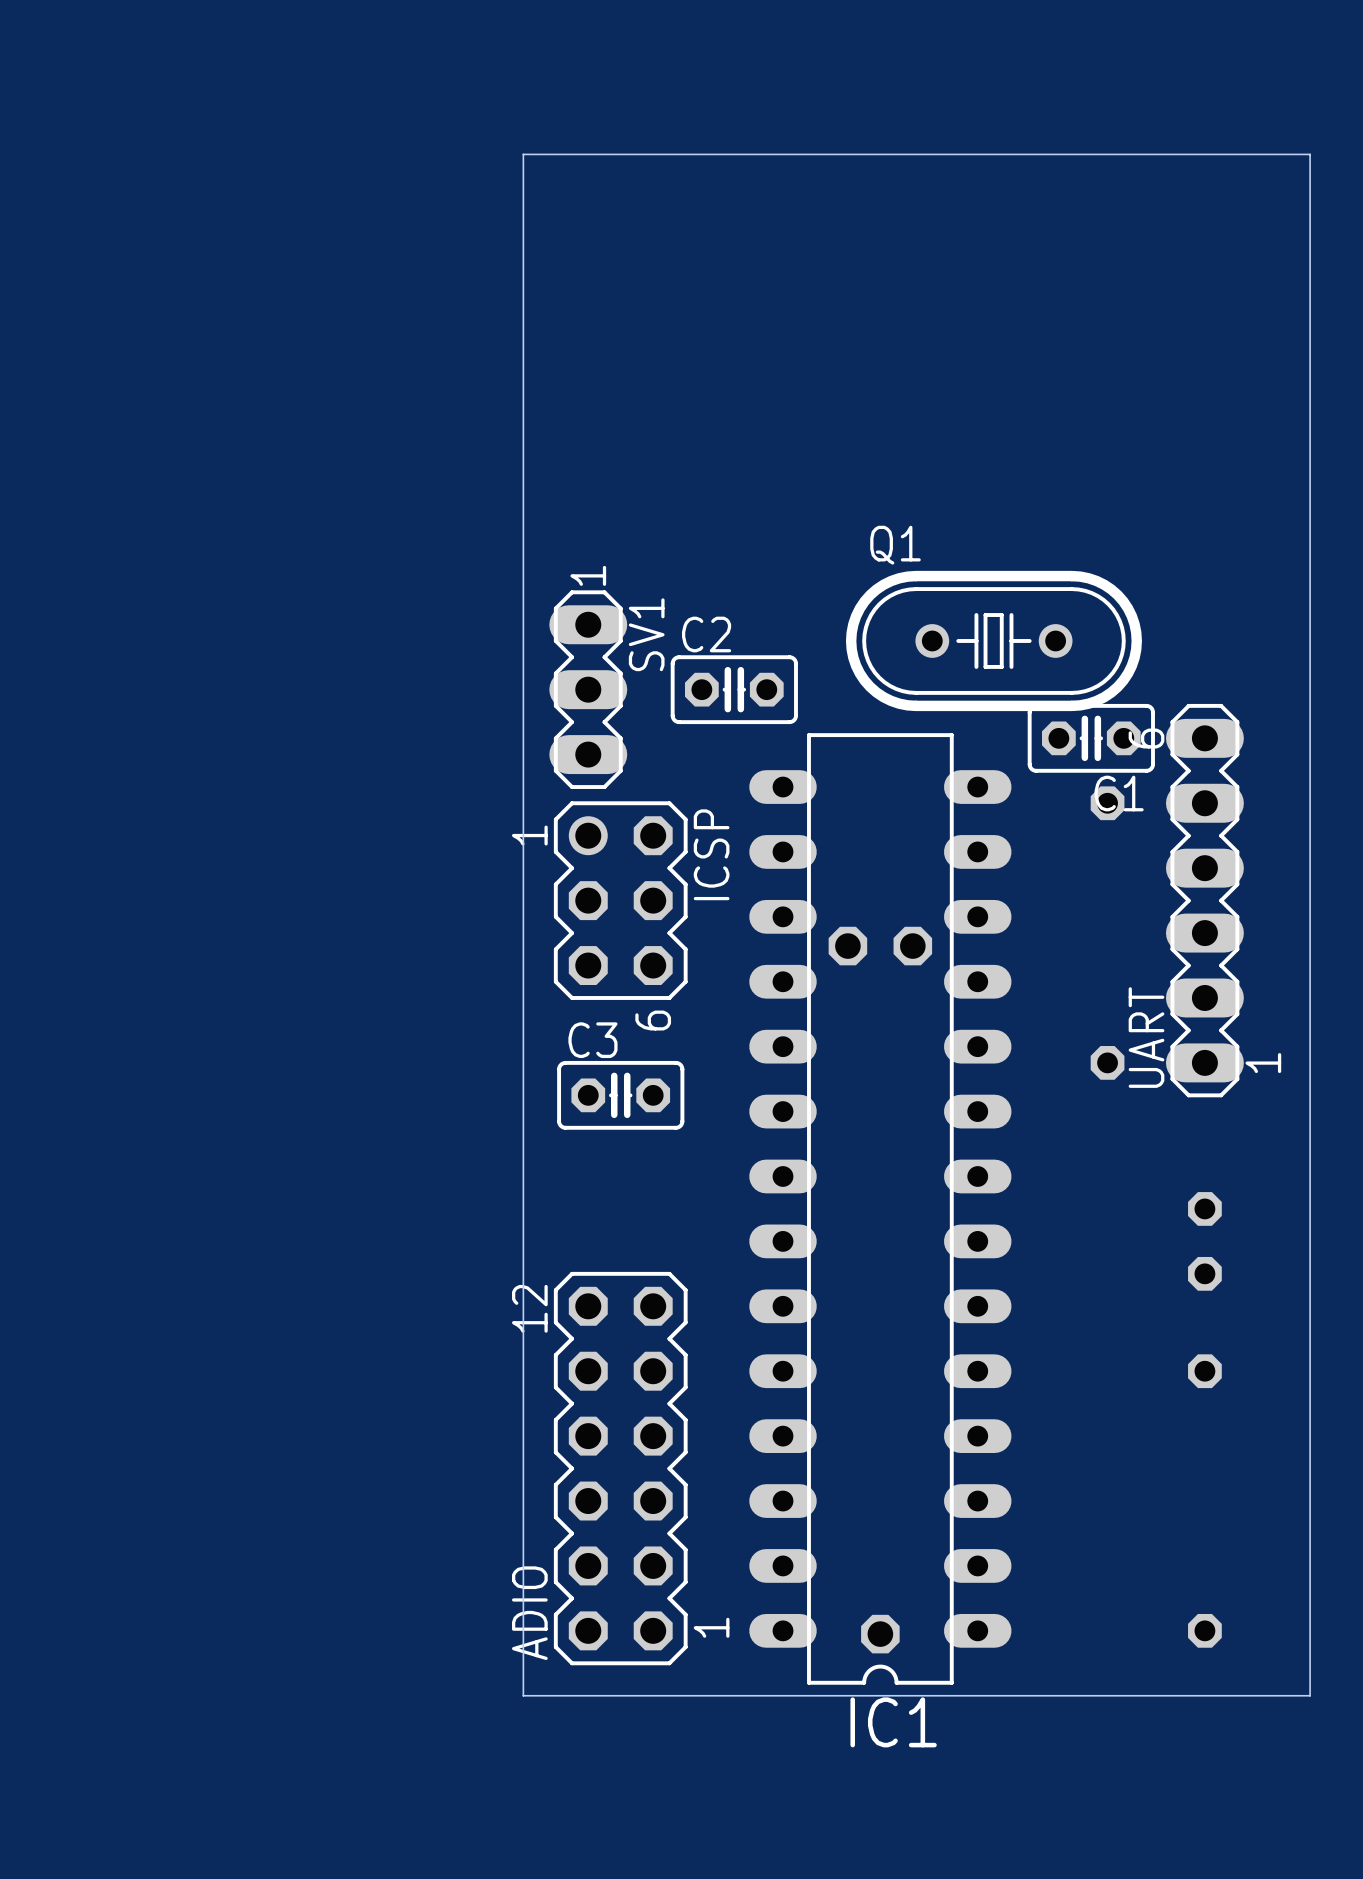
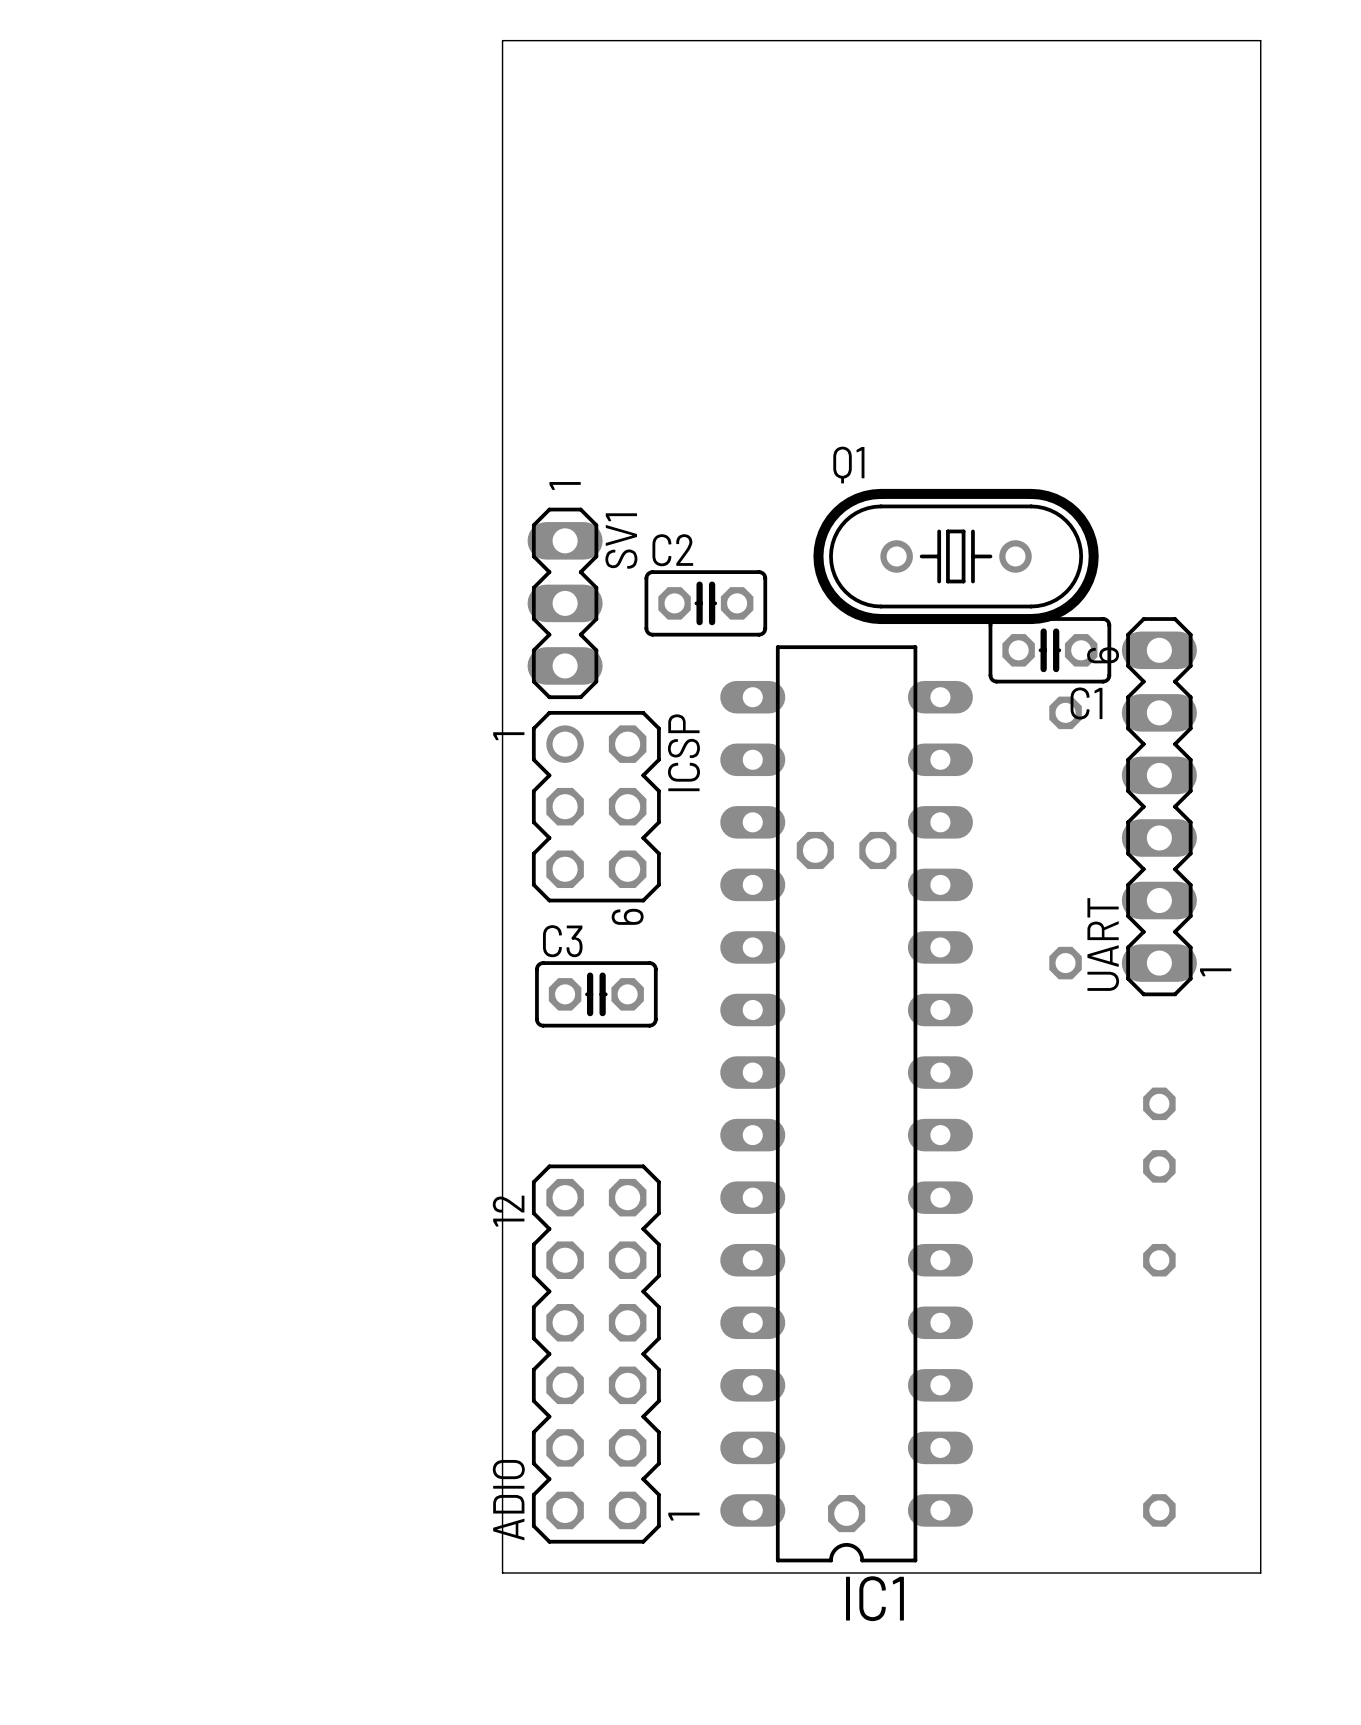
board edge: (523, 154) (1310, 154) -> (502, 87) (502, 40) (1260, 40) (1260, 87)

